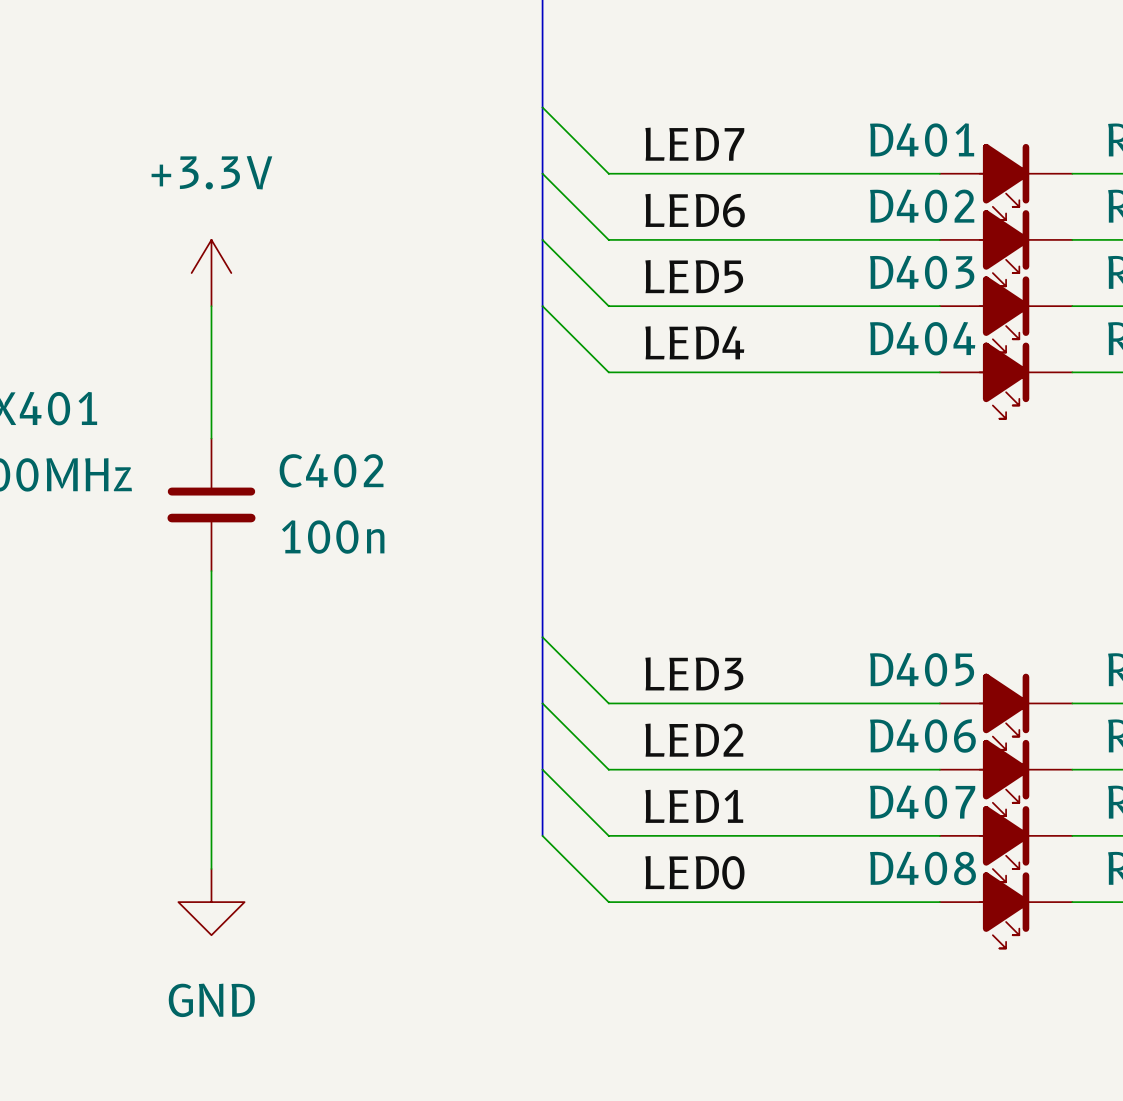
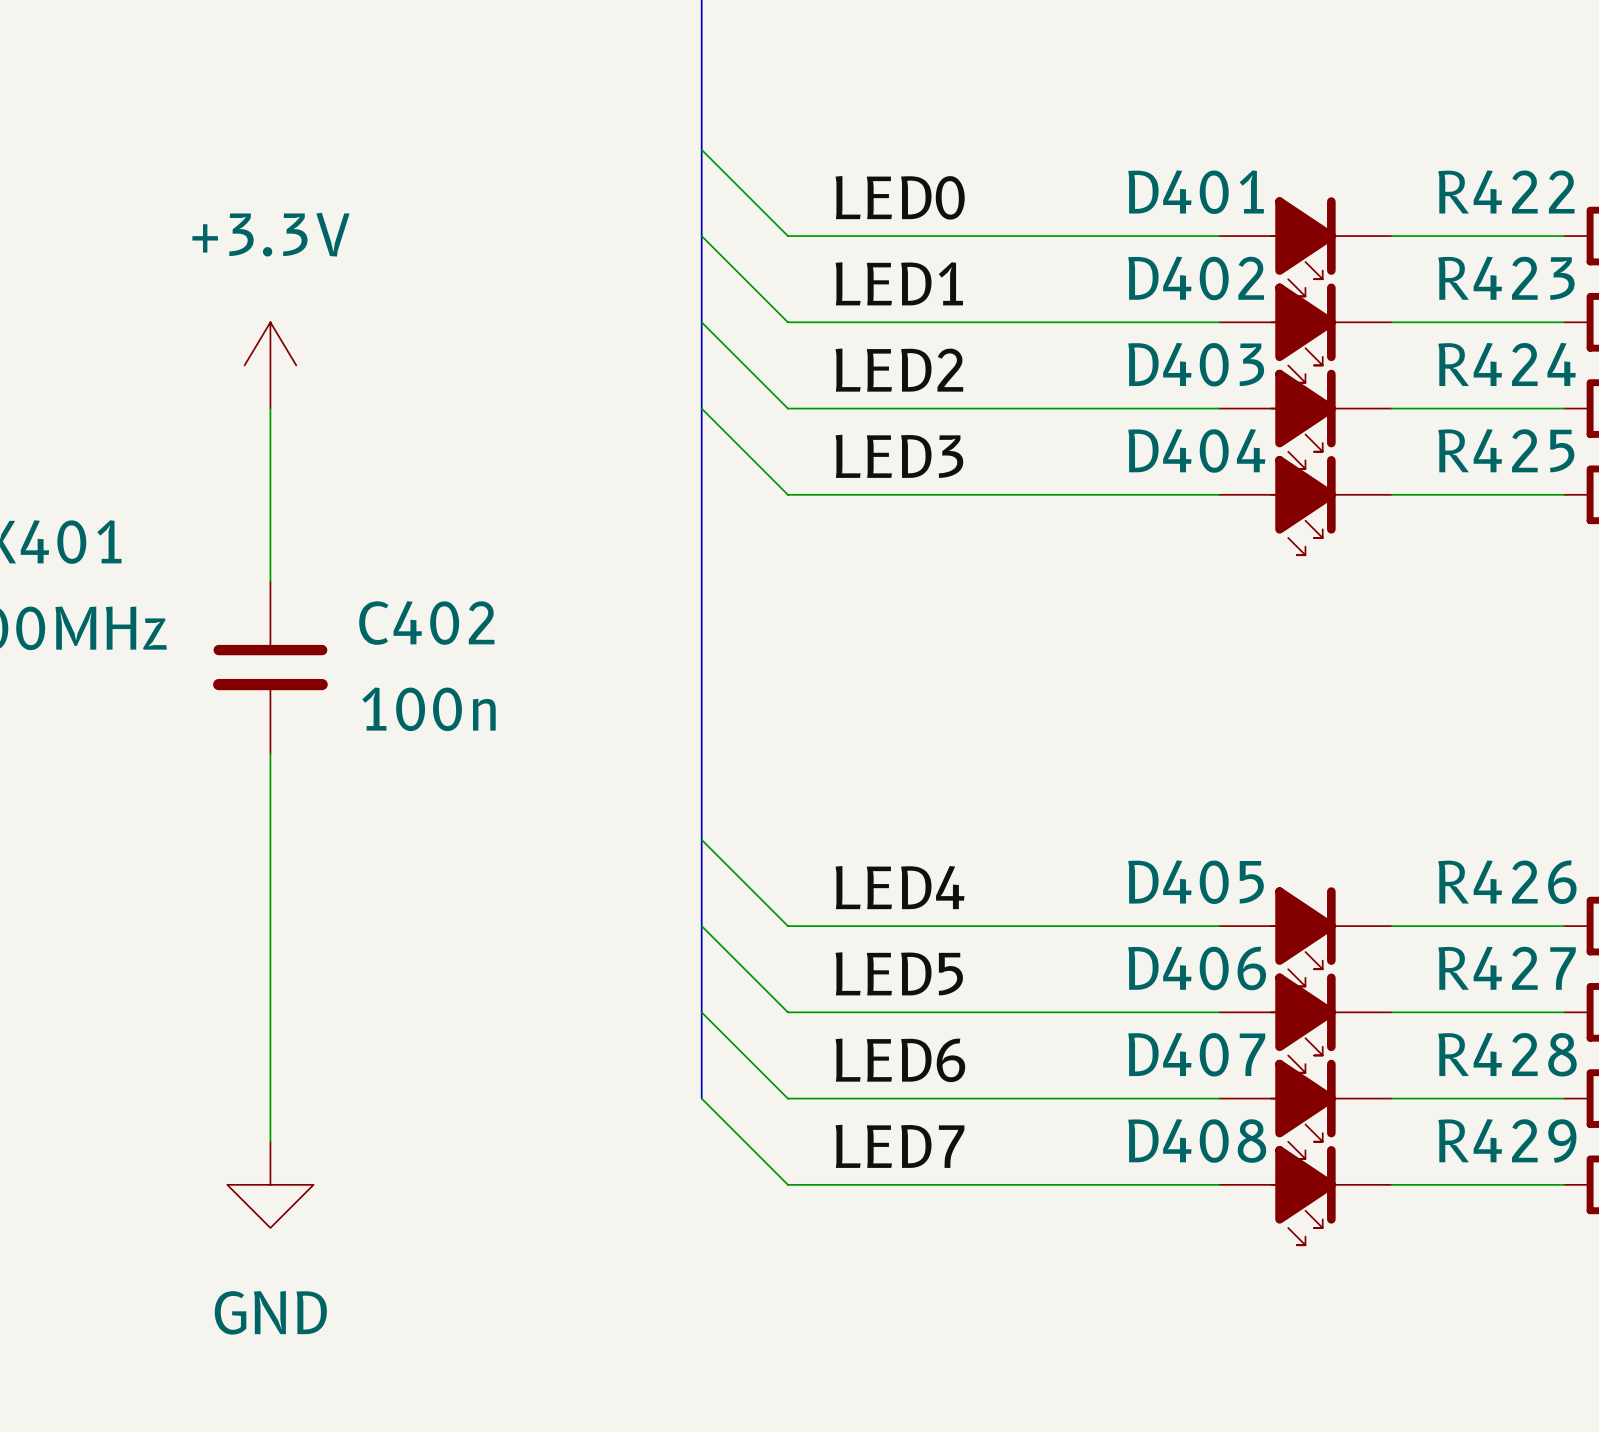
label: LED7 (694, 144) -> LED0 (900, 197)
label: LED6 (695, 210) -> LED1 (899, 283)
label: LED5 (694, 276) -> LED2 (899, 370)
label: LED4 (694, 342) -> LED3 (899, 456)
label: LED3 (694, 673) -> LED4 (900, 887)
label: LED2 (694, 740) -> LED5 (899, 973)
label: LED1 (694, 806) -> LED6 (900, 1060)
label: LED0 (694, 872) -> LED7 (900, 1146)

